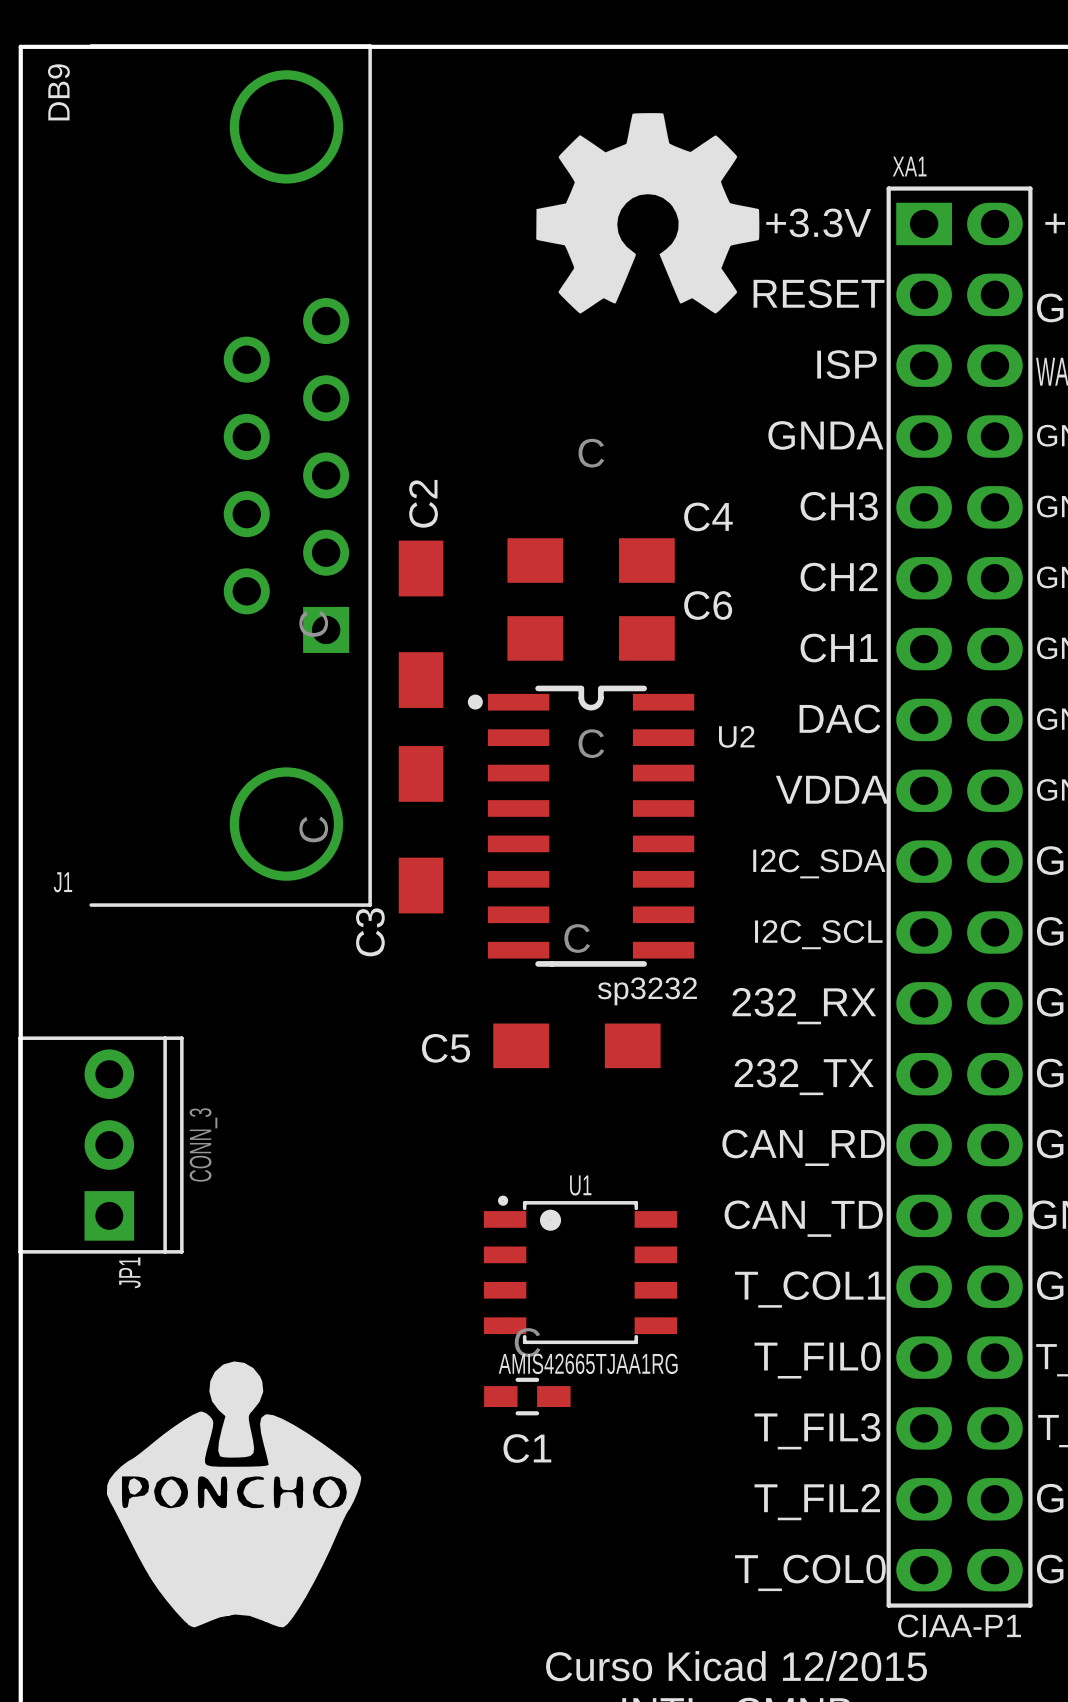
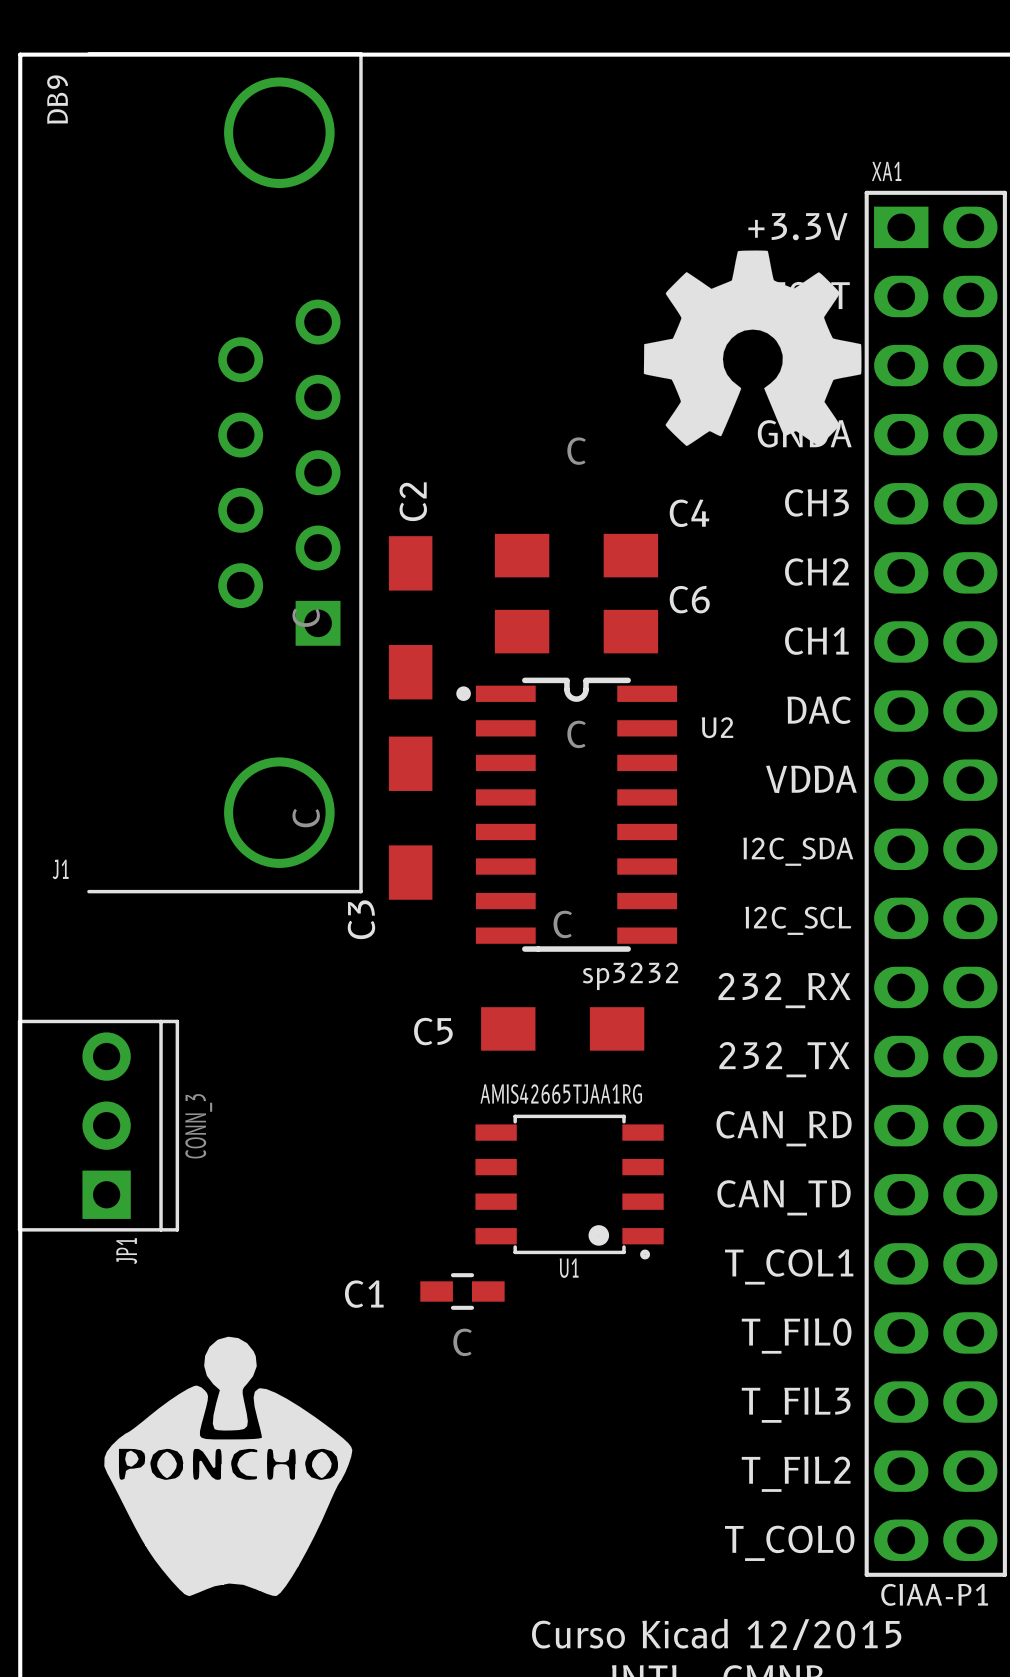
drawing position: (647, 213) -> (752, 348)
U1 rotation: 0° (580, 1269) -> 180° (569, 1187)
C1 value position: C (527, 1342) -> C (462, 1342)
C1 position: (527, 1396) -> (462, 1291)
C1 name position: C1 (527, 1448) -> C1 (364, 1294)

